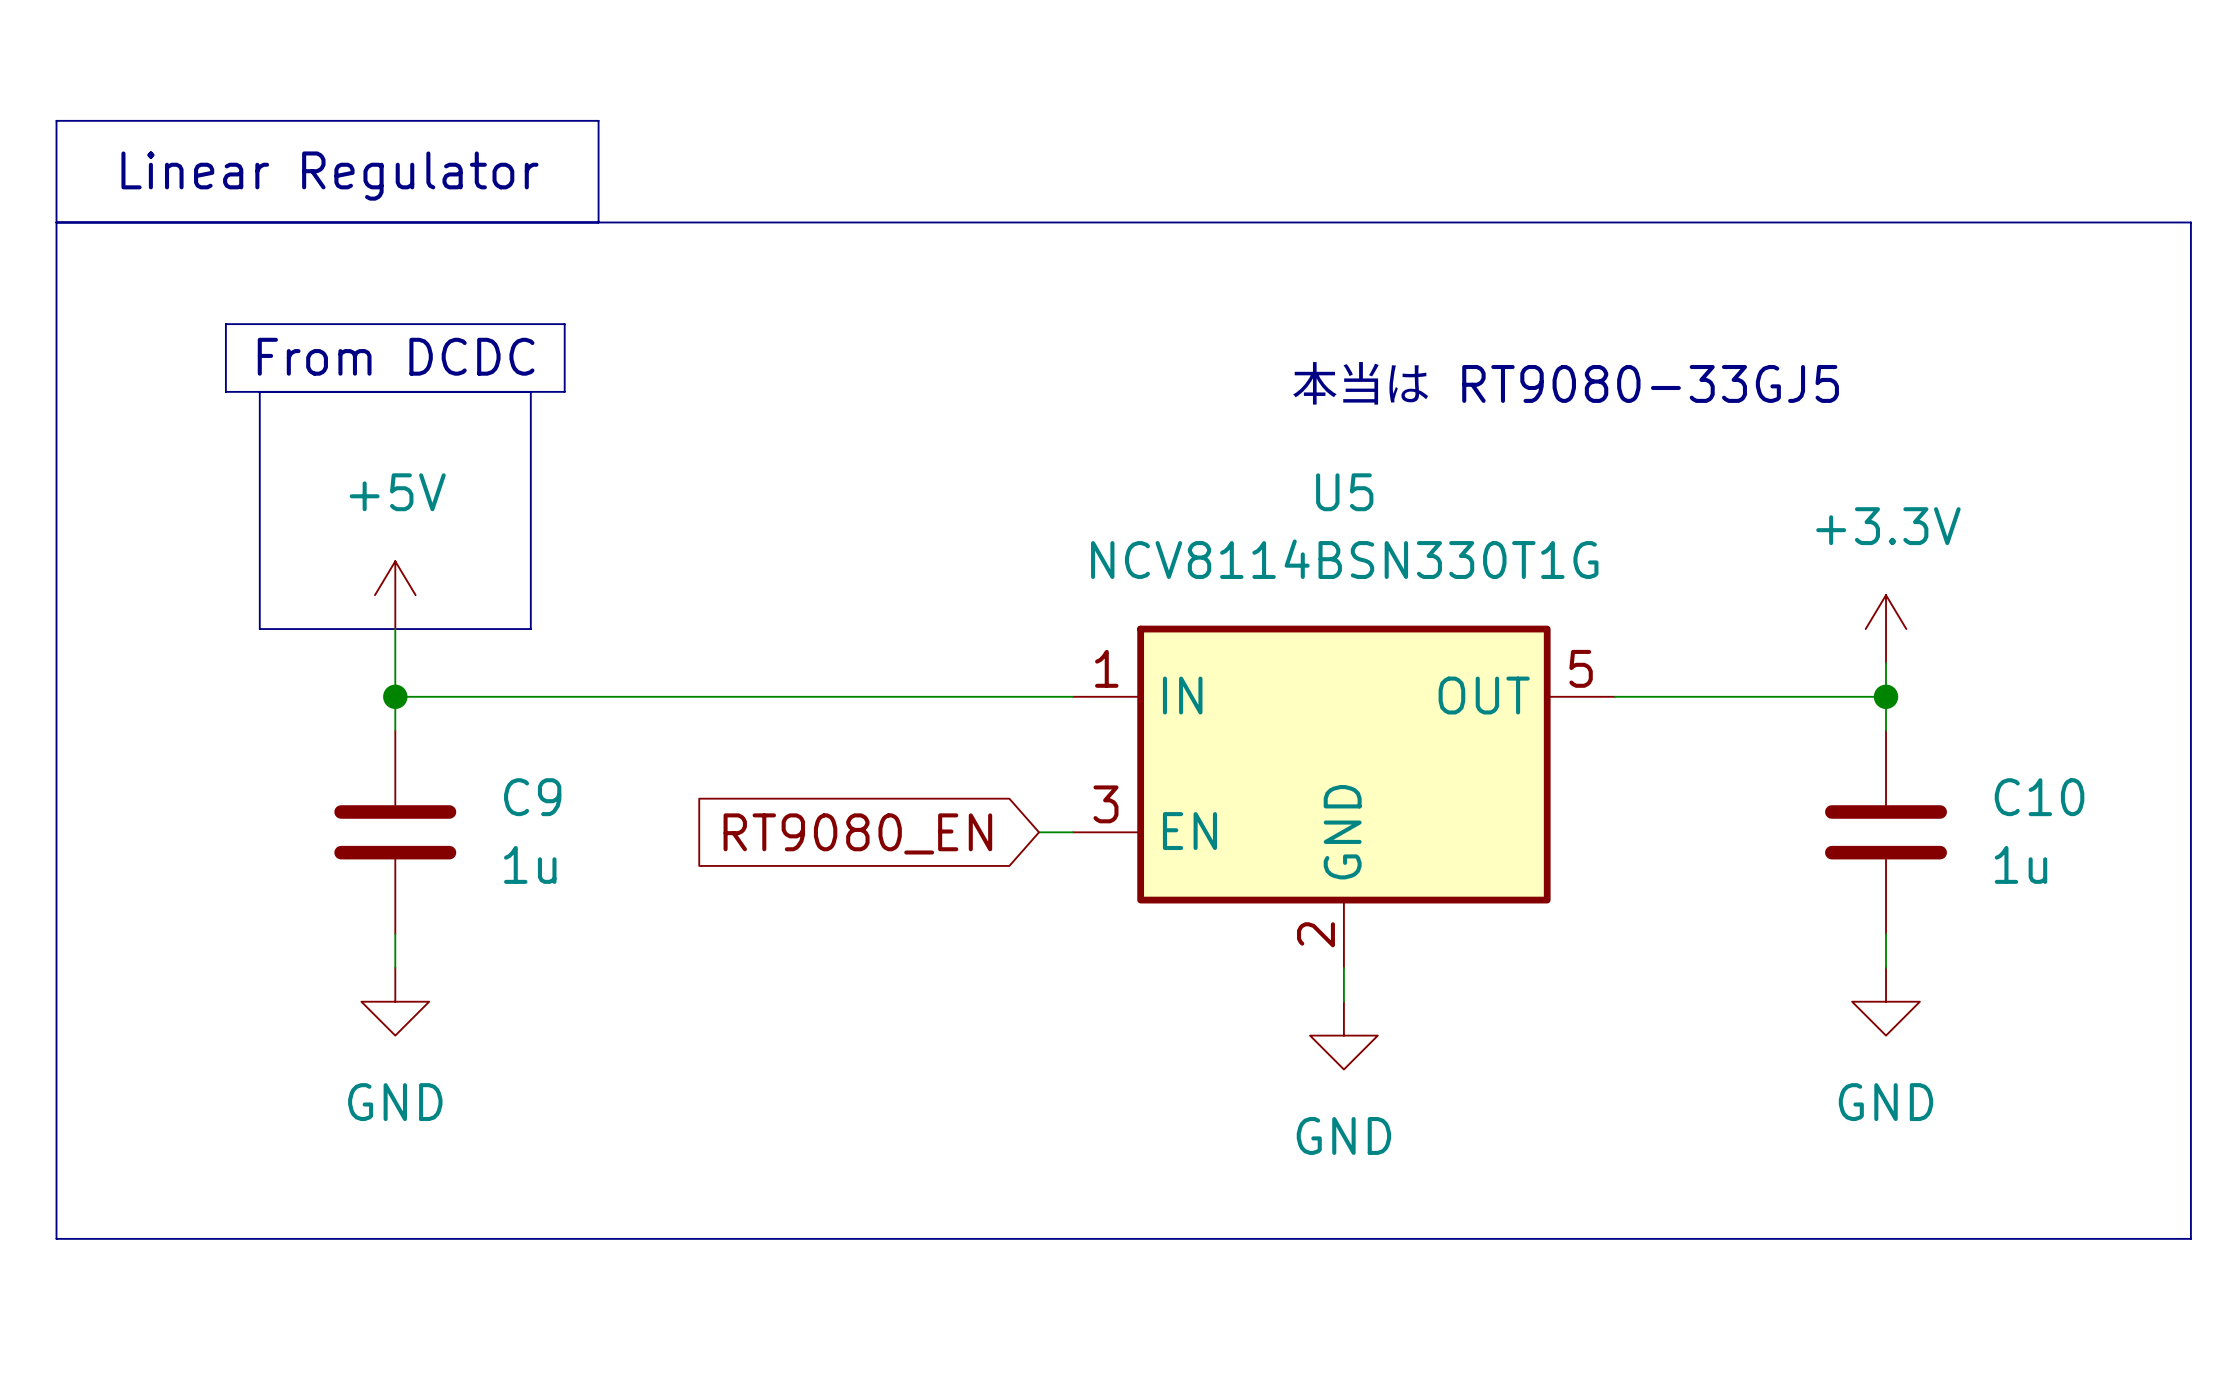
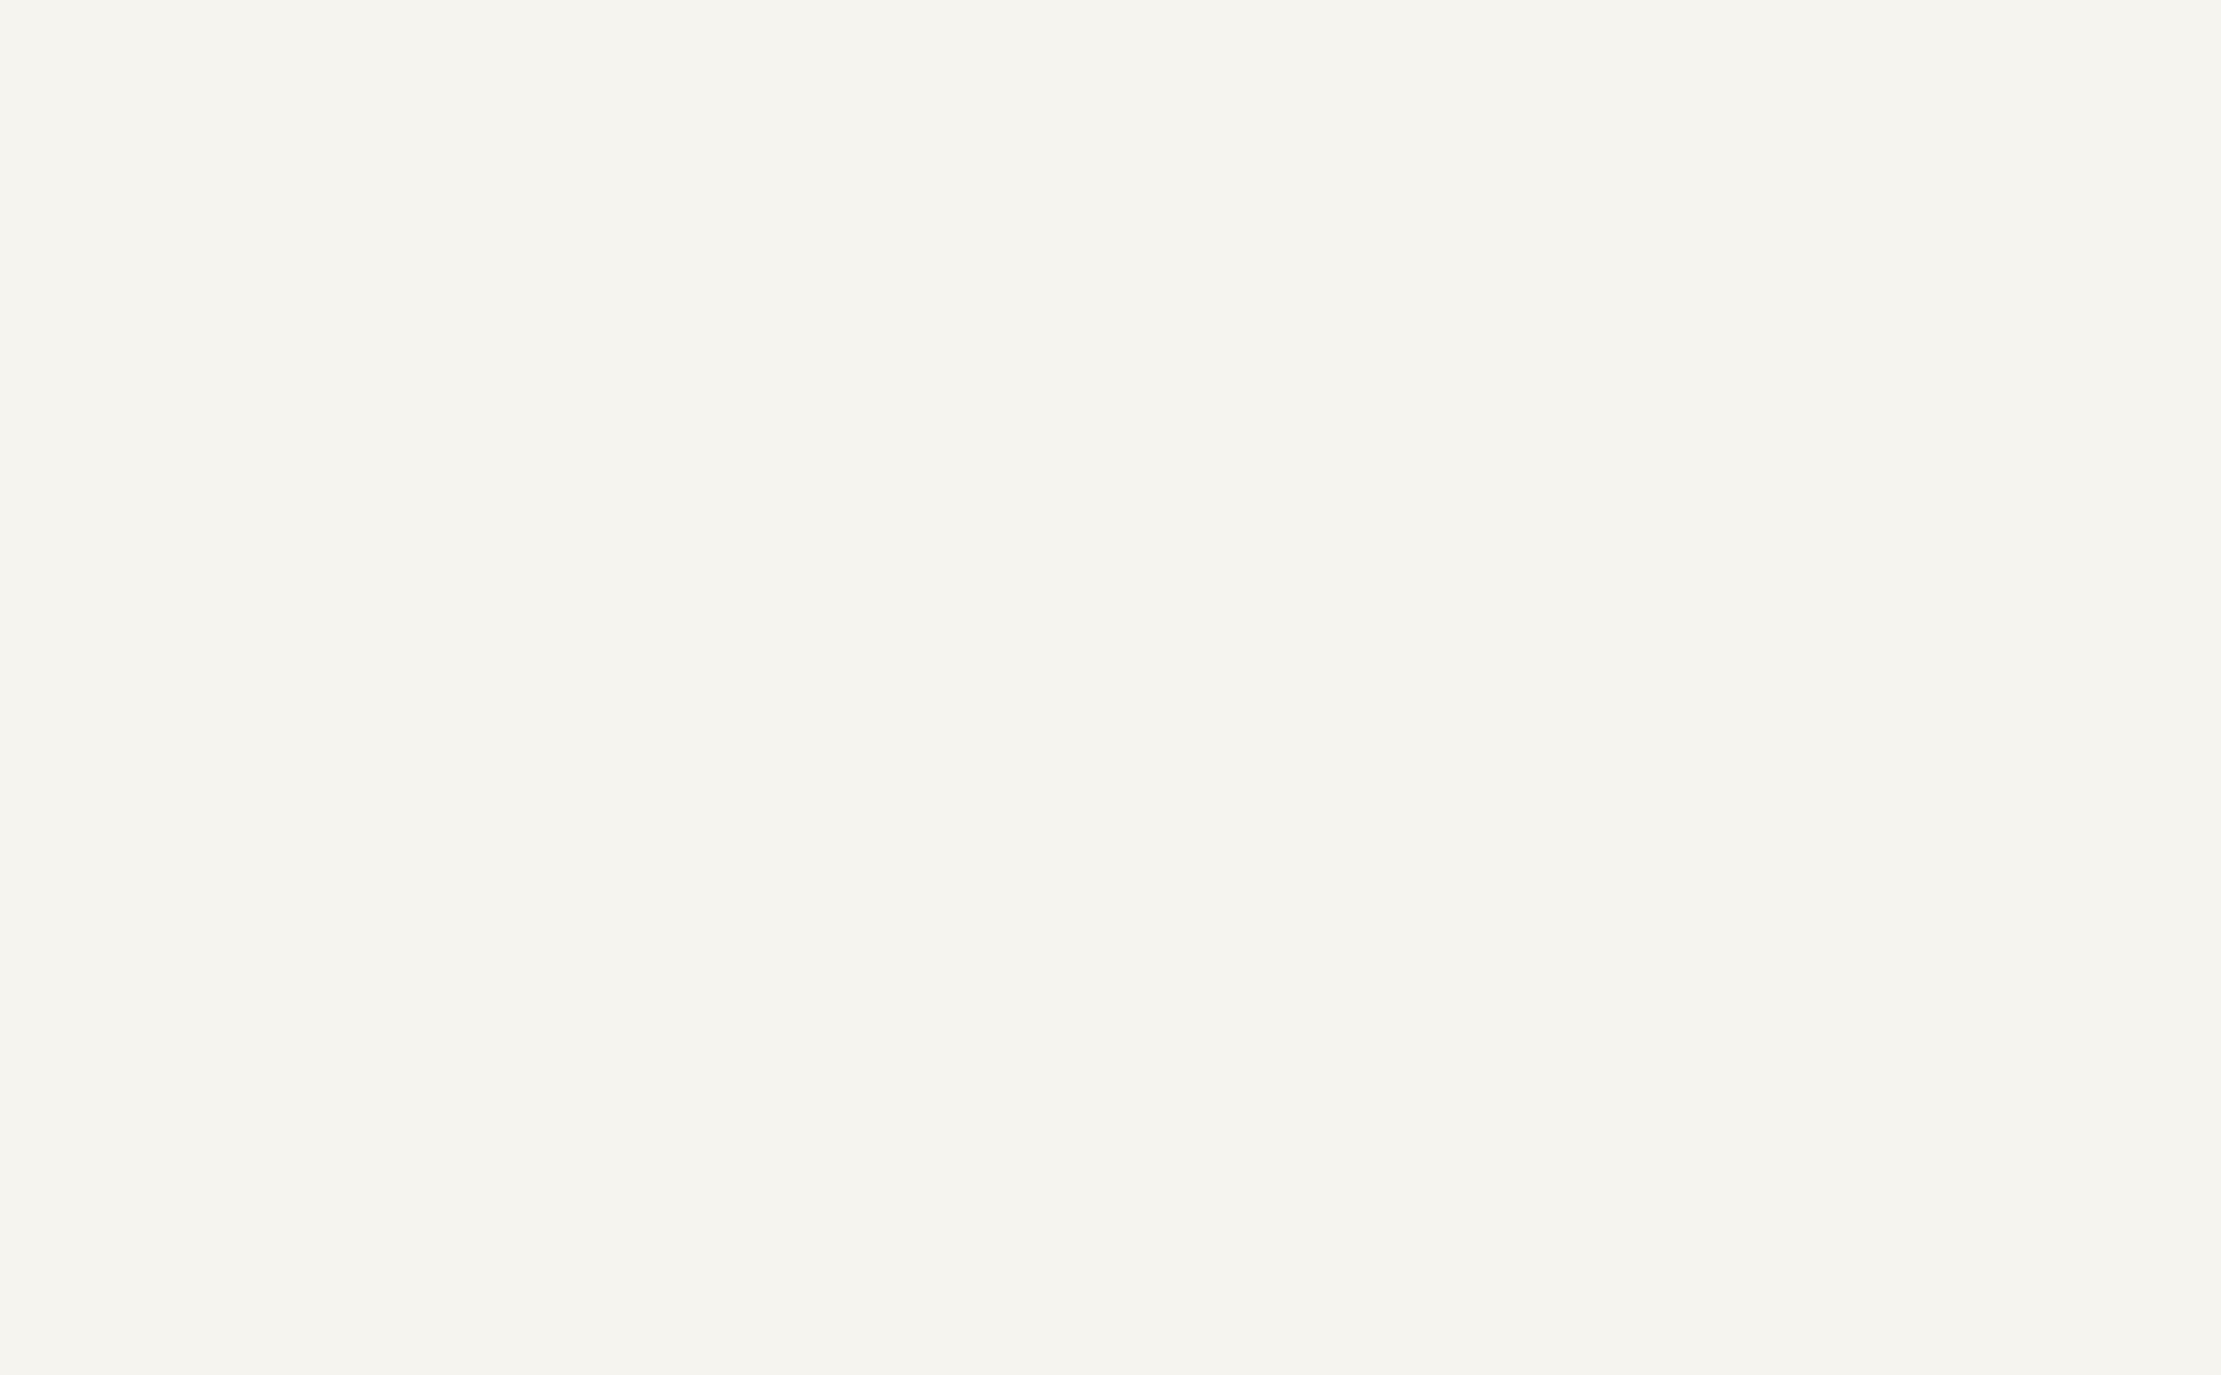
text: Linear Regulator (329, 176) -> none
line: (56, 222) (2190, 222) (2190, 1238) (56, 1238) (56, 120) (598, 120) (598, 222) -> none
line: (225, 324) (564, 324) (564, 391) (225, 391) (225, 324) -> none
text: From DCDC (396, 356) -> none
text: 本当は RT9080-33GJ5 (1565, 383) -> none
line: (259, 391) (259, 629) (530, 629) (530, 391) -> none
power symbol: +5V (395, 595) -> none
wire: (395, 629) (395, 730) -> none
power symbol: +3.3V (1886, 629) -> none
wire: (1886, 662) (1886, 730) -> none
wire: (395, 696) (1072, 696) -> none
junction: (395, 696) -> none
wire: (1614, 696) (1886, 696) -> none
junction: (1886, 696) -> none
U5: NCV8114BSN330T1G (1343, 796) -> none
C9: 1u (395, 832) -> none
wire: (1039, 832) (1072, 832) -> none
C10: 1u (1886, 832) -> none
global label: RT9080_EN (857, 833) -> none
wire: (395, 933) (395, 967) -> none
wire: (1886, 933) (1886, 967) -> none
wire: (1343, 967) (1343, 1001) -> none
power symbol: GND (395, 1001) -> none
power symbol: GND (1886, 1001) -> none
power symbol: GND (1343, 1035) -> none

